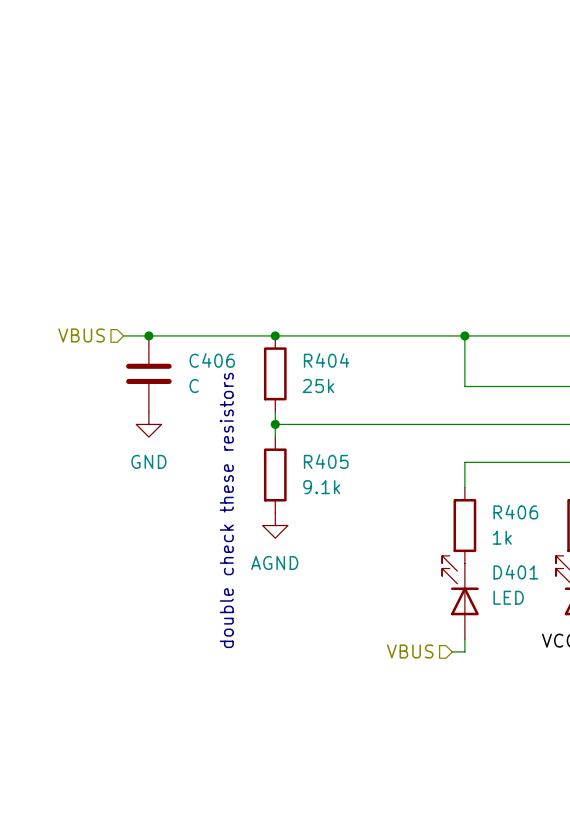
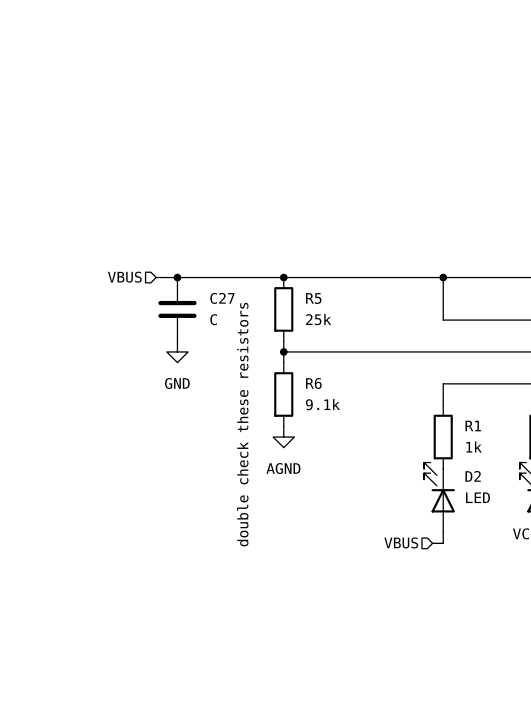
C406 name: C406 (212, 360) -> C27 (222, 298)
R404 name: R404 (326, 360) -> R5 (313, 298)
R405 name: R405 (326, 461) -> R6 (313, 383)
R406 name: R406 (515, 512) -> R1 (473, 425)
D401 name: D401 (515, 572) -> D2 (473, 476)

